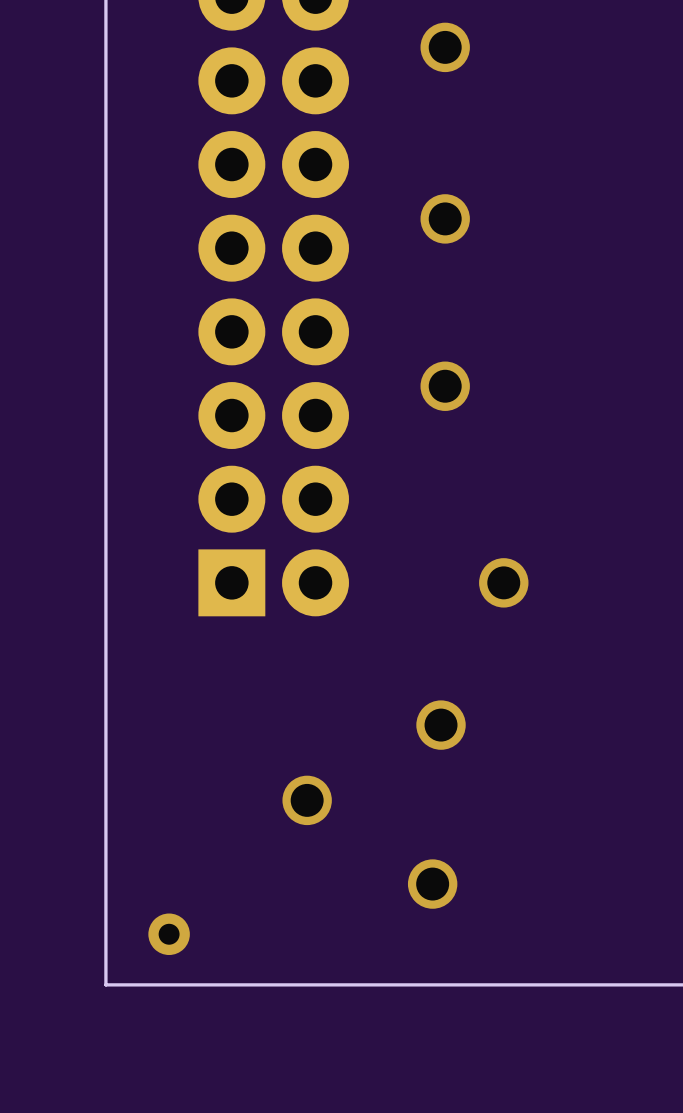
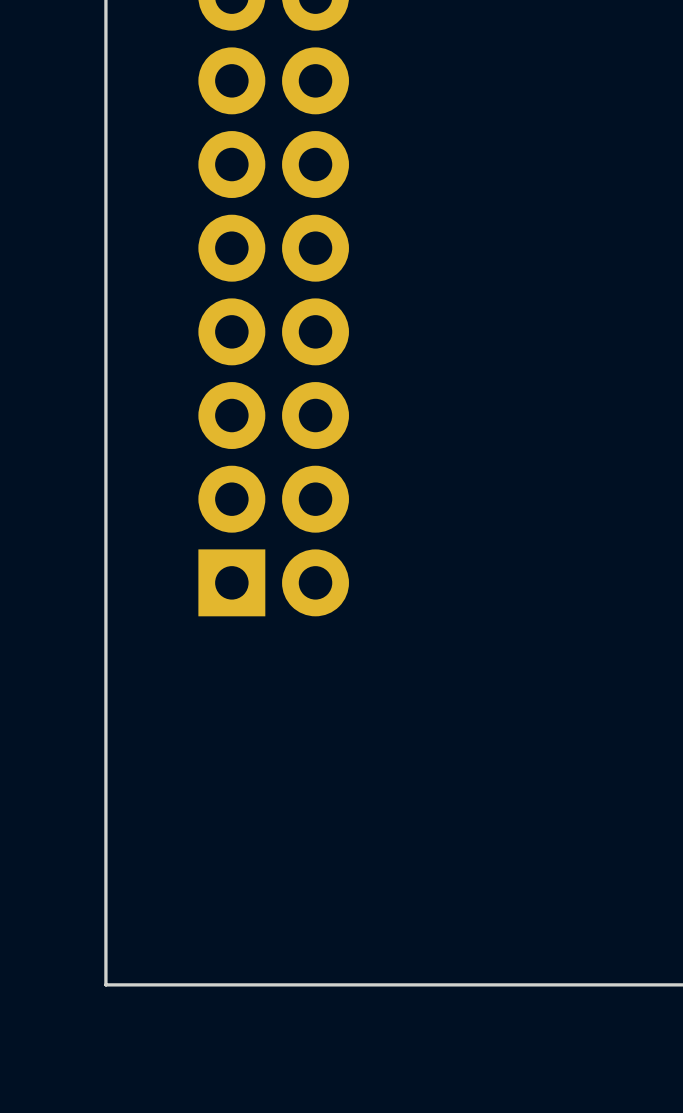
via: (445, 47) -> none
via: (445, 218) -> none
via: (445, 386) -> none
via: (503, 582) -> none
via: (441, 725) -> none
via: (307, 800) -> none
via: (432, 884) -> none
via: (169, 934) -> none

